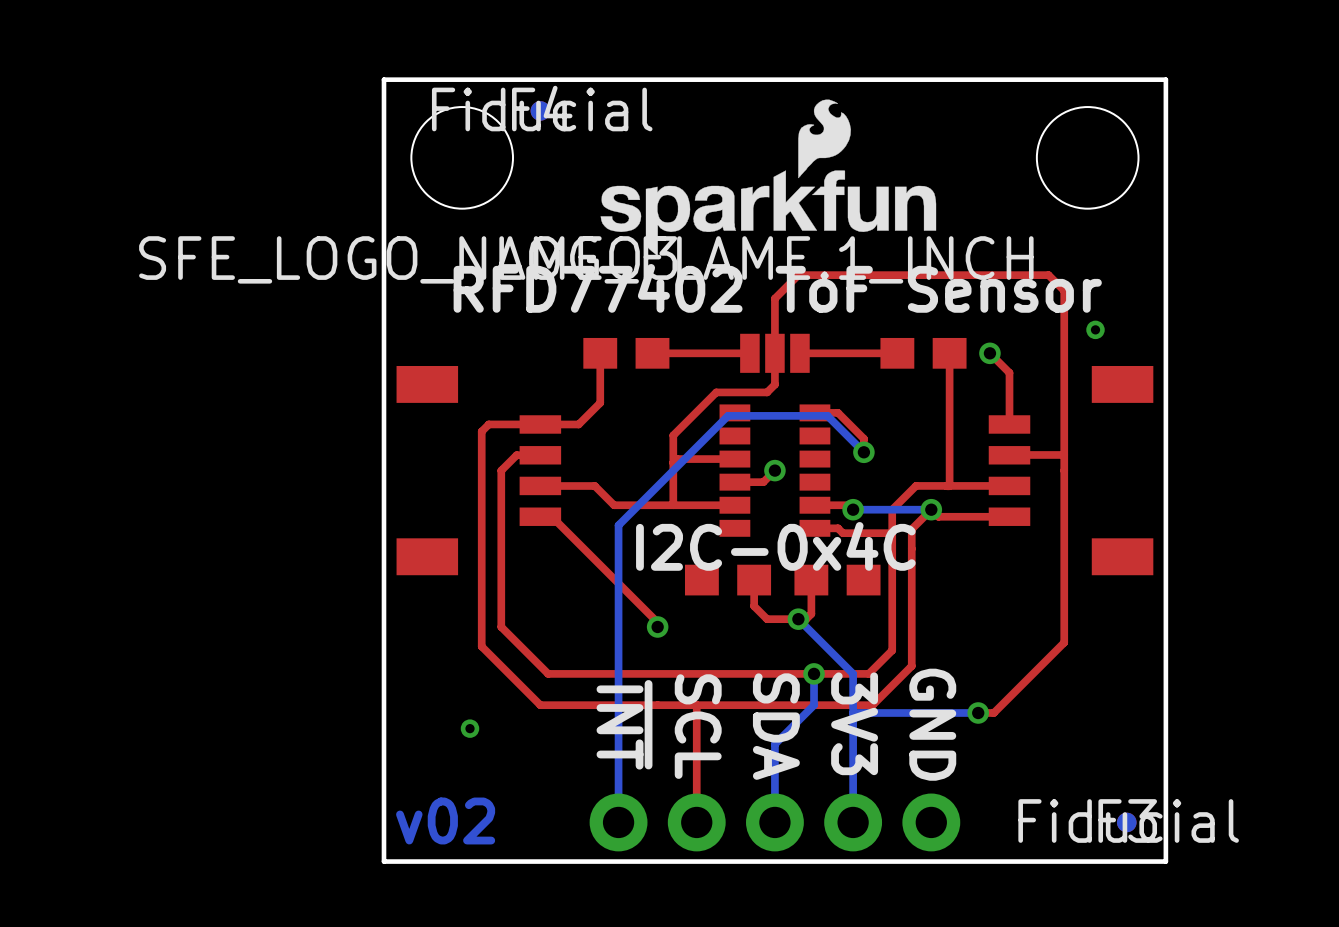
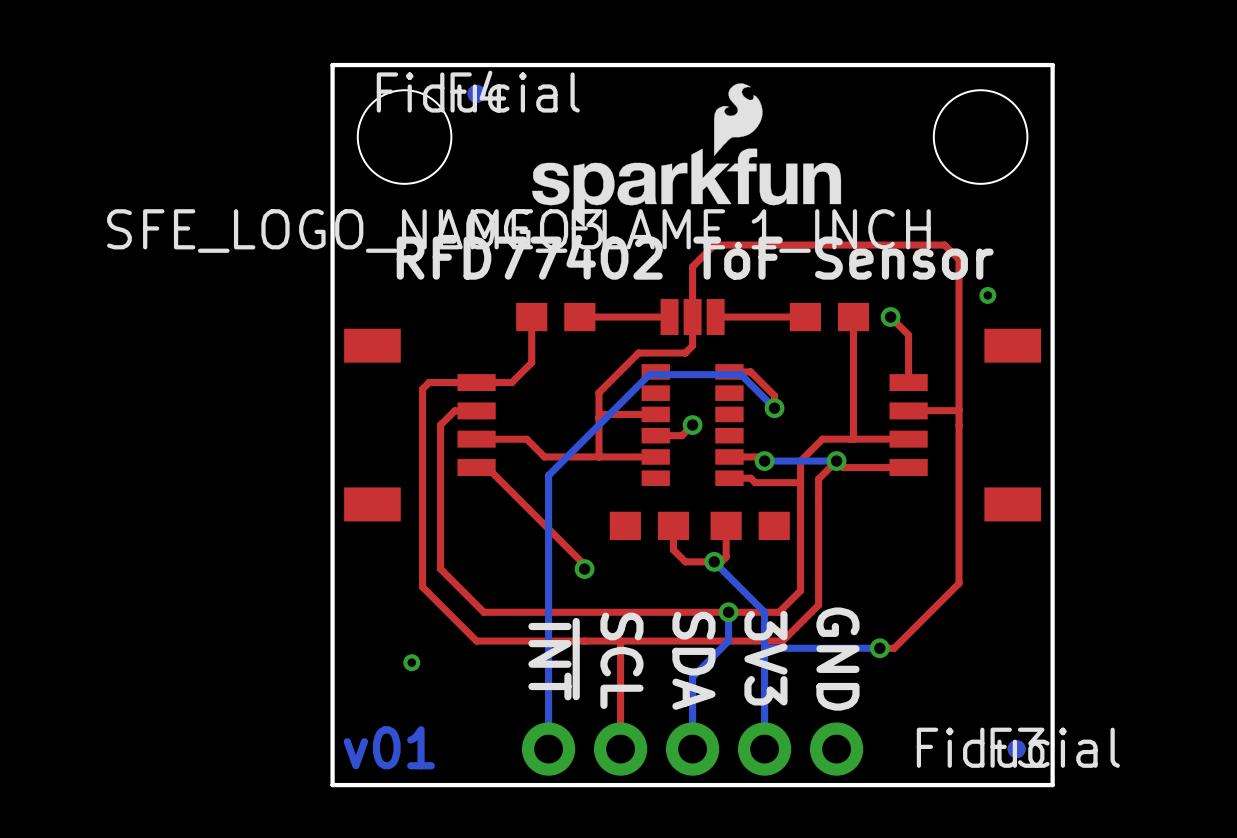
text: I2C-0x4C (775, 546) -> none
text: v02 (445, 820) -> v01 (389, 747)

